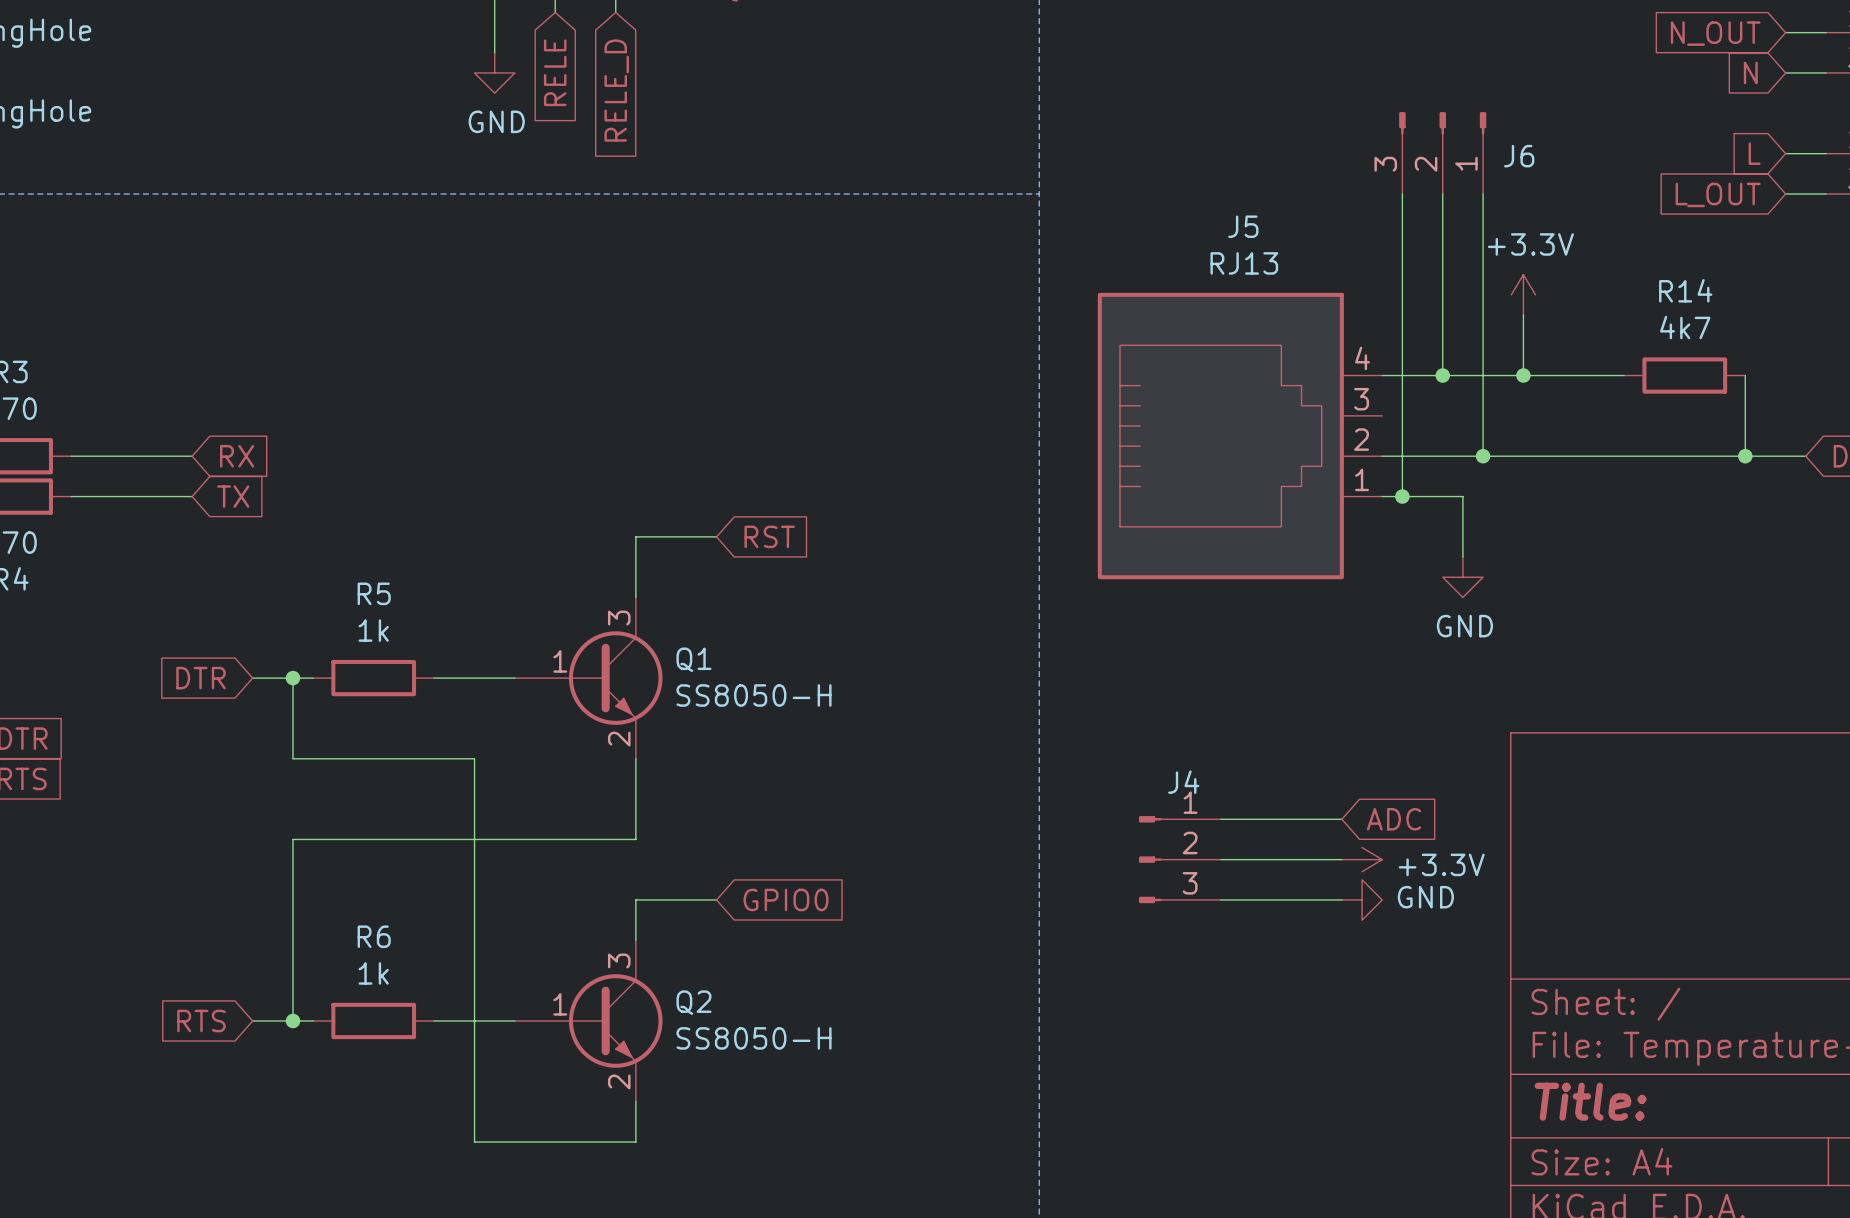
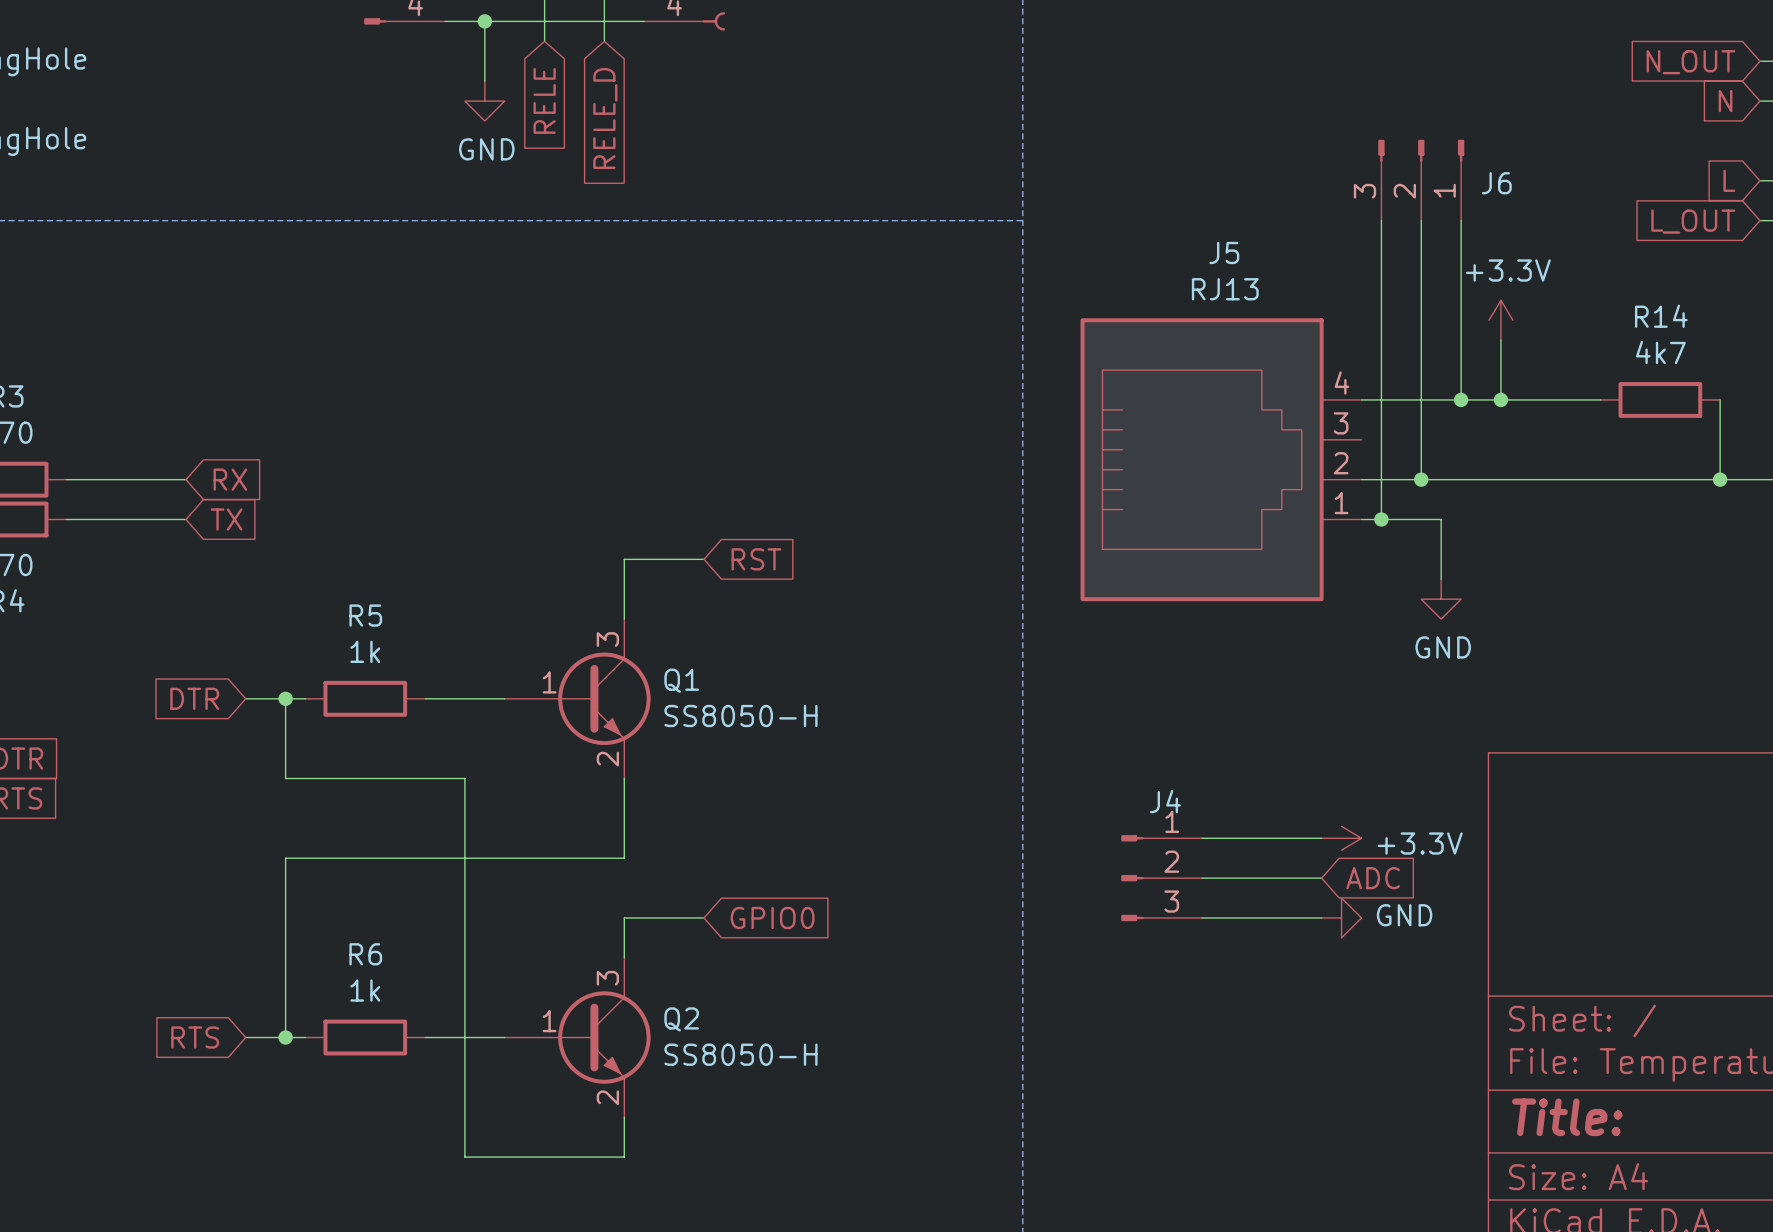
junction: (1442, 375) -> none
wire: (1483, 375) (1483, 456) -> (1421, 399) (1421, 479)
junction: none -> (1461, 399)
junction: none -> (1421, 479)
junction: (1483, 456) -> none
global label position: ADC (1394, 819) -> ADC (1373, 878)
power symbol position: +3.3V (1362, 859) -> +3.3V (1341, 838)

